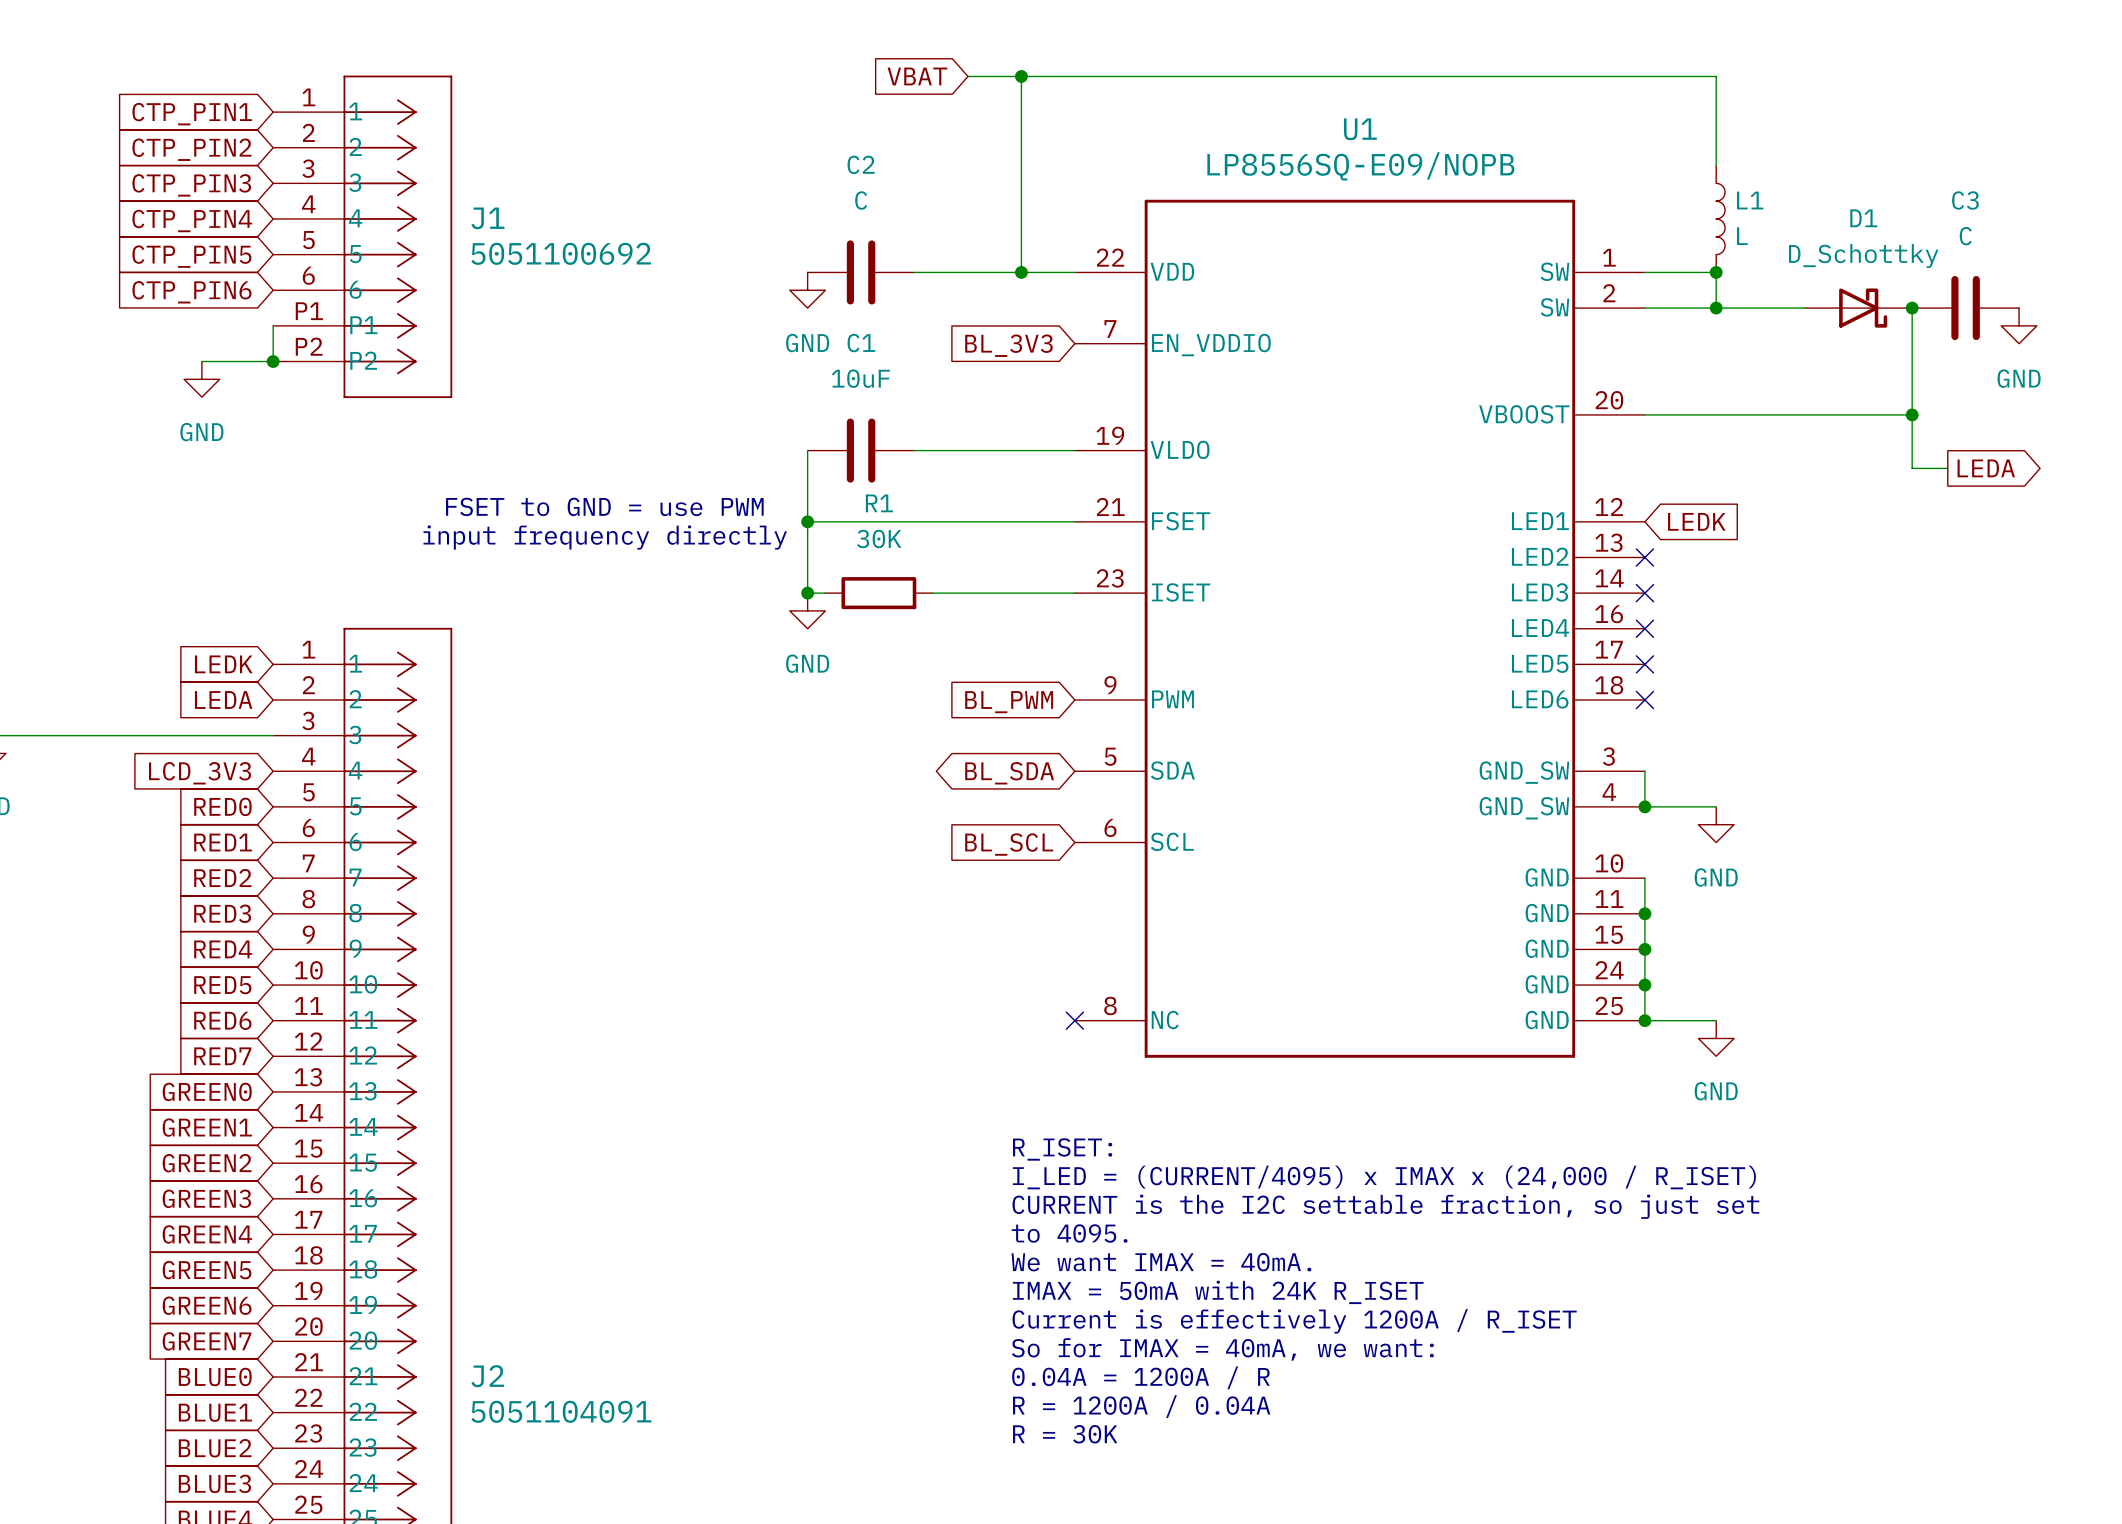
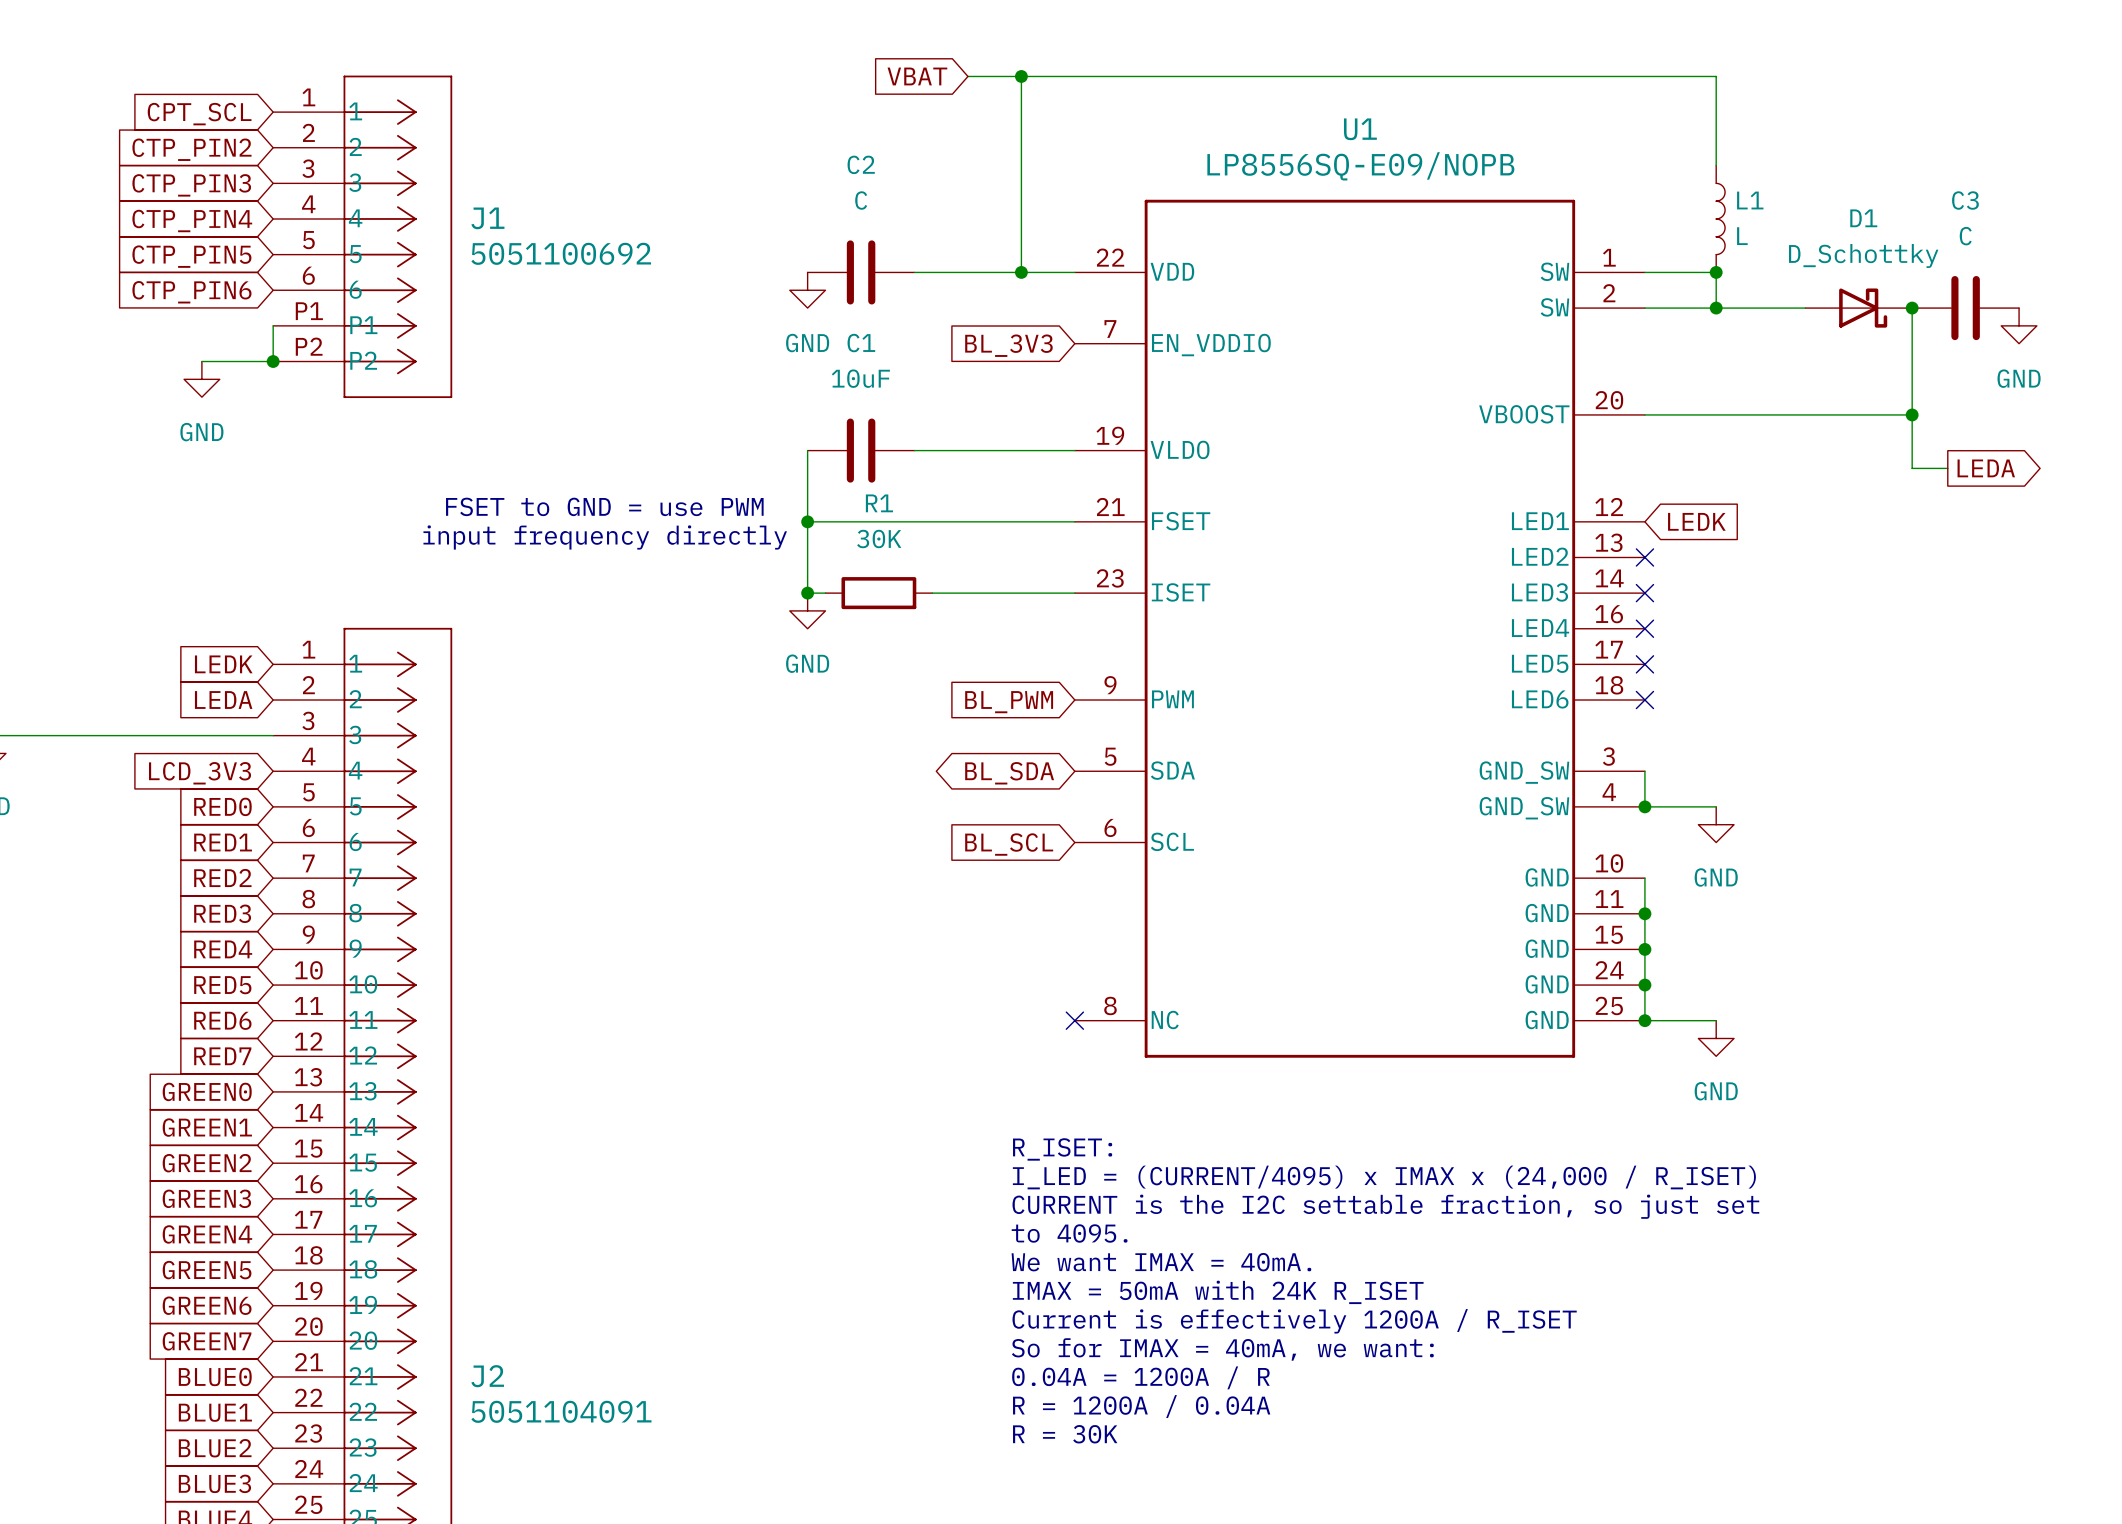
global label: CTP_PIN1 (192, 114) -> CPT_SCL (199, 114)

